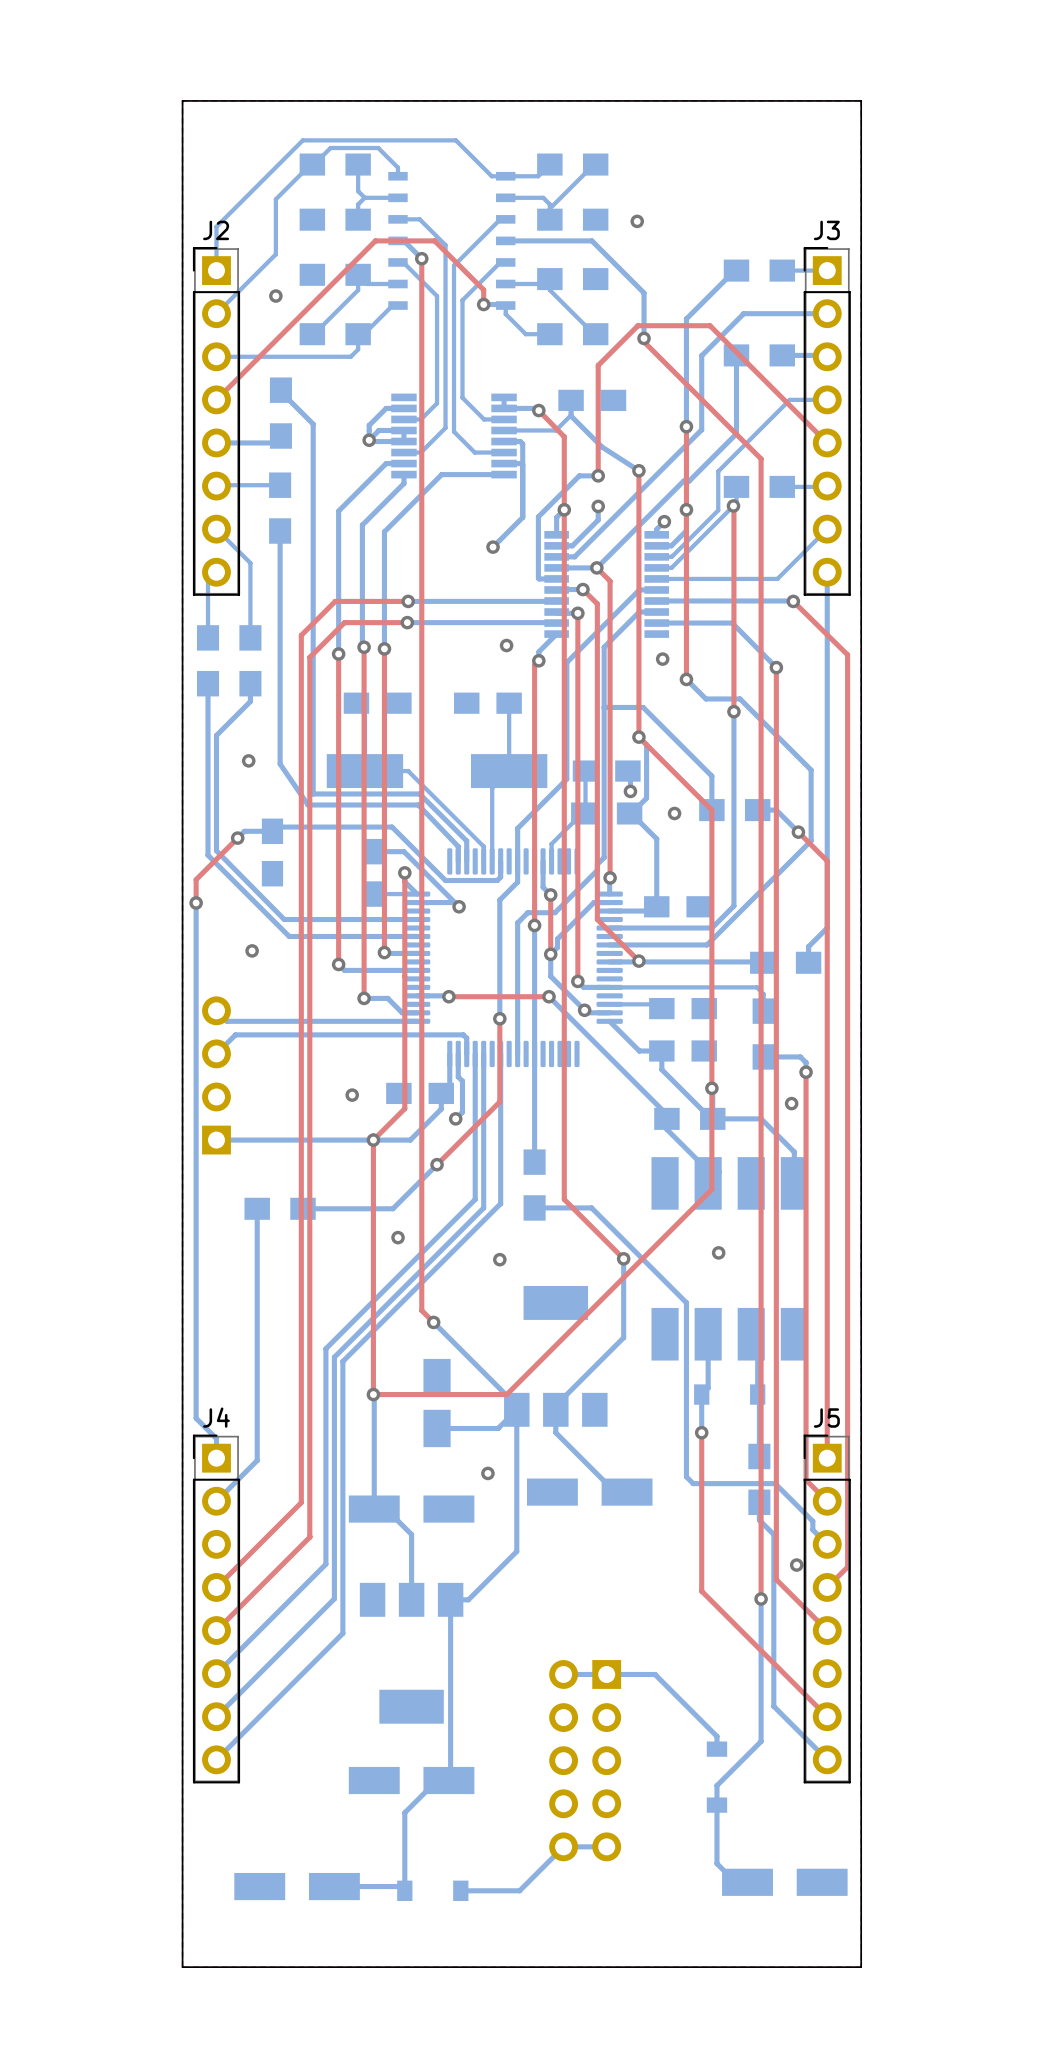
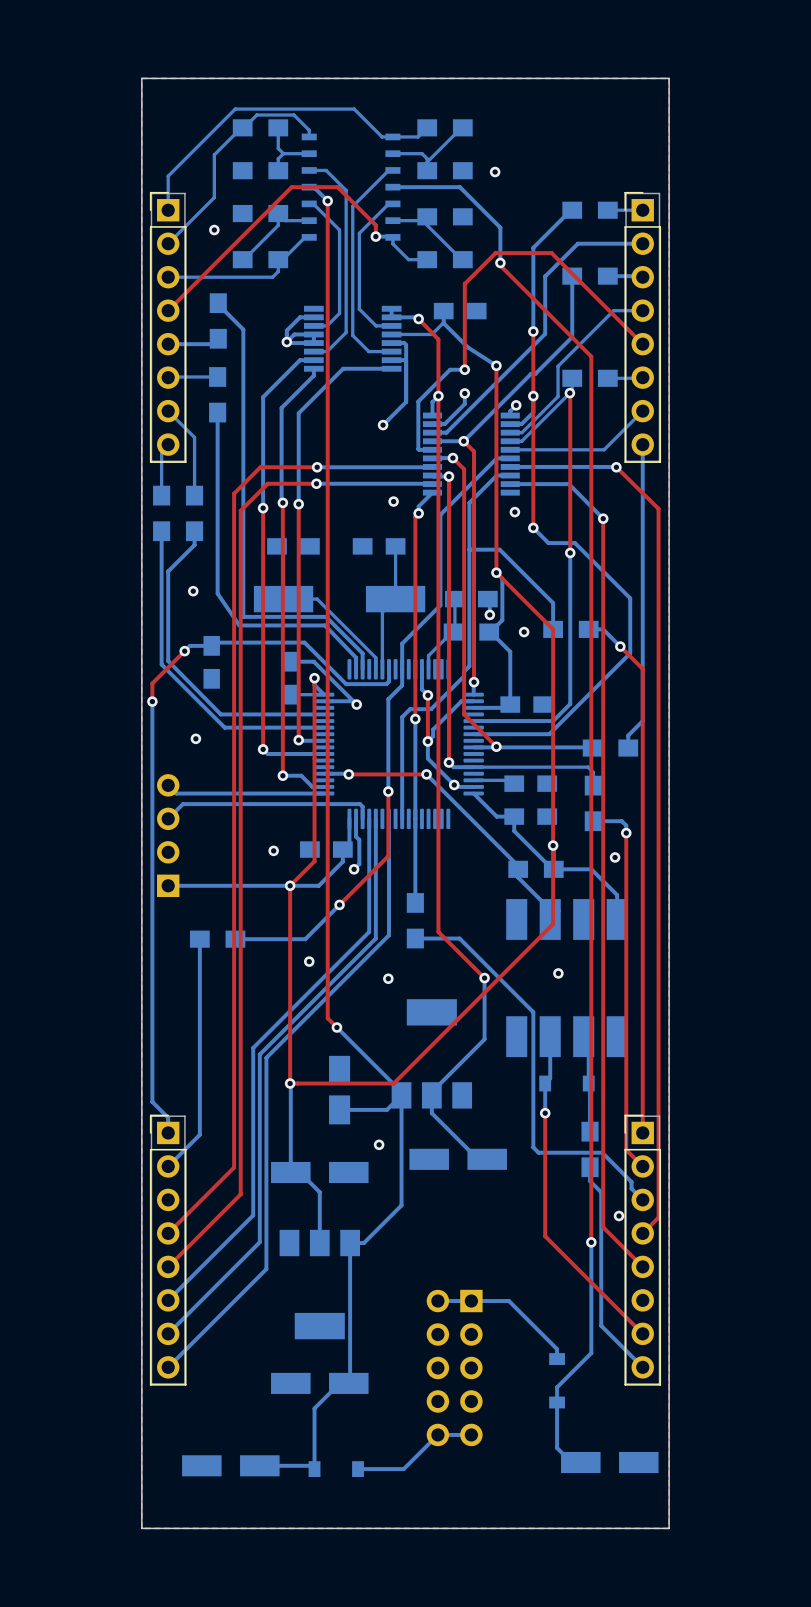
J2 name: J2 (216, 230) -> none
J3 name: J3 (826, 230) -> none
J4 name: J4 (216, 1417) -> none
J5 name: J5 (826, 1418) -> none

